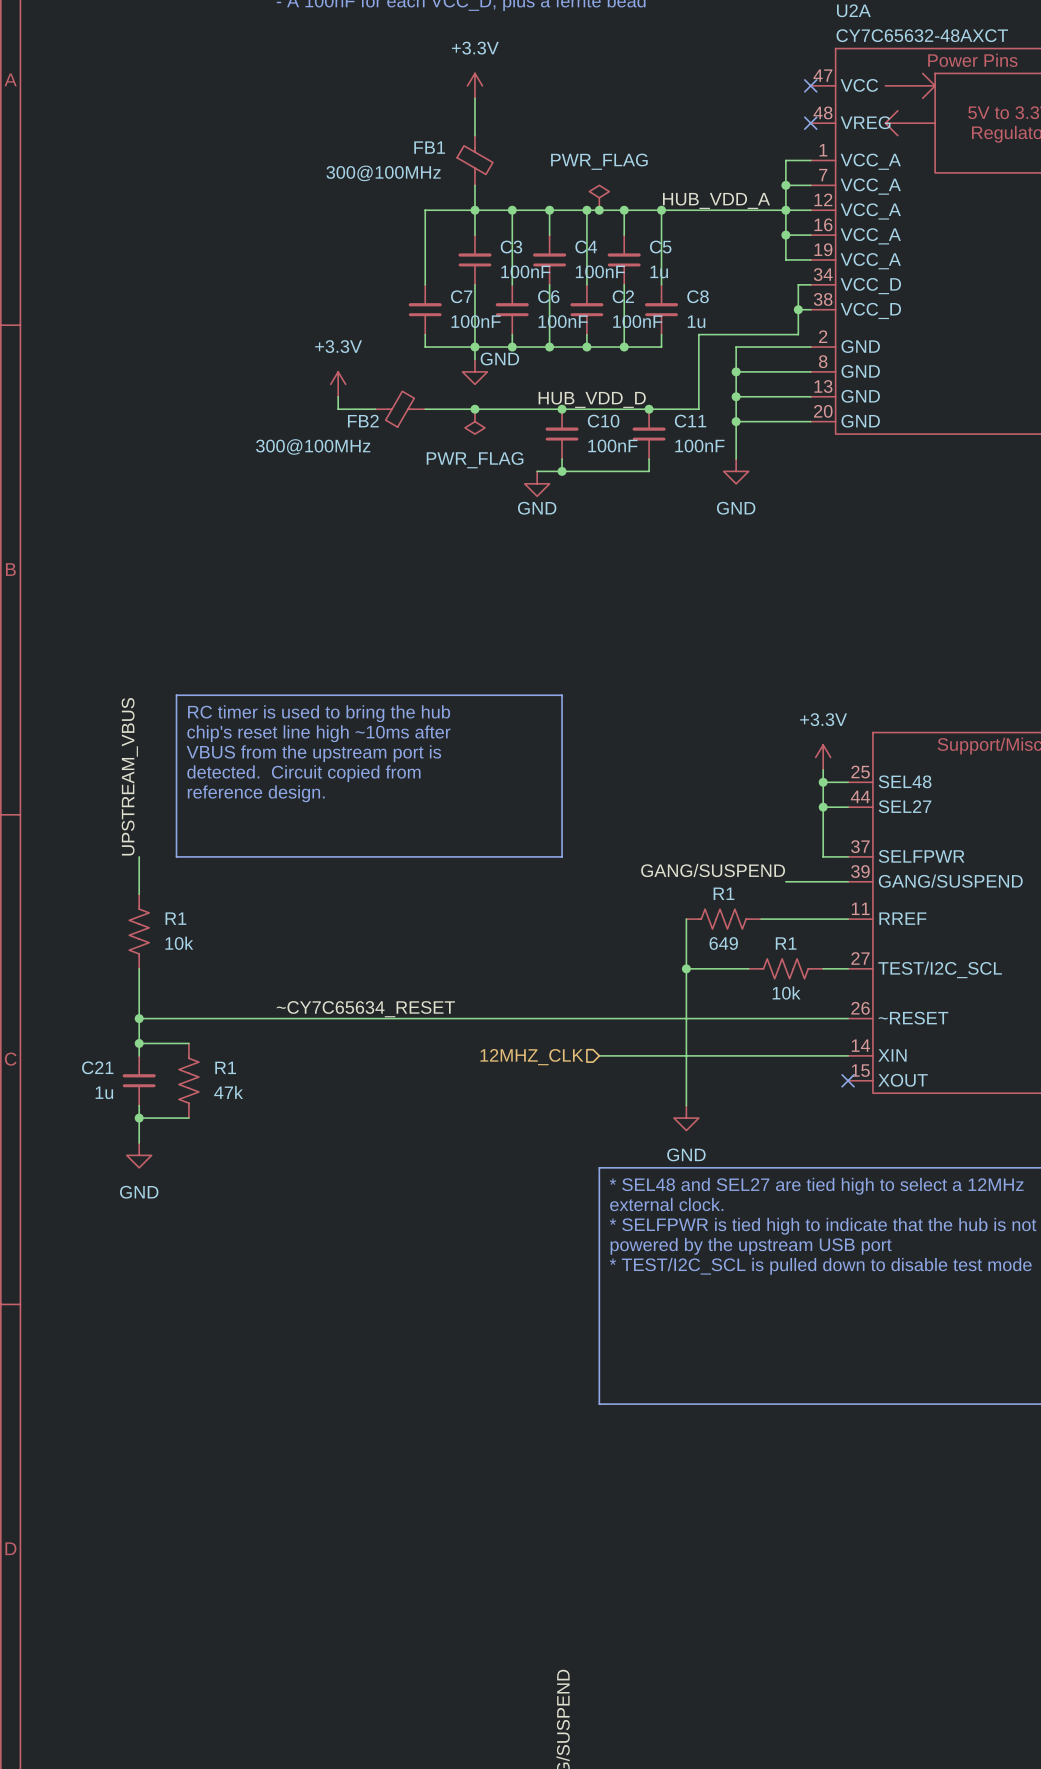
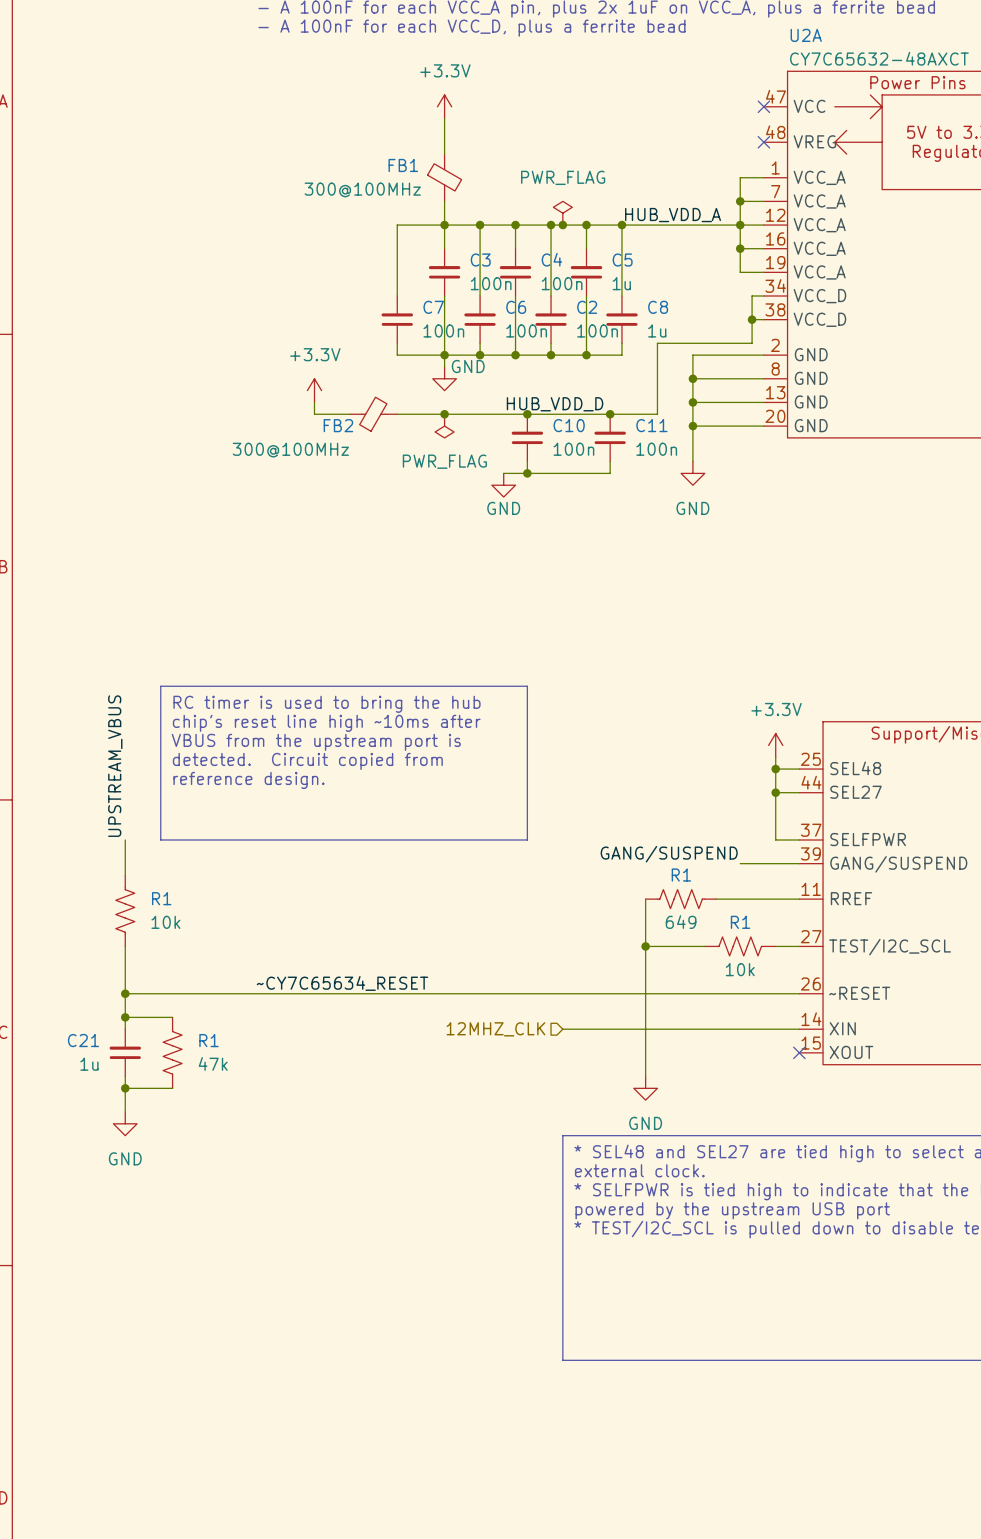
C3 value: 100nF (525, 271) -> 100n (491, 283)
C4 value: 100nF (600, 271) -> 100n (562, 283)
C7 value: 100nF (476, 321) -> 100n (443, 330)
C6 value: 100nF (563, 321) -> 100n (526, 330)
C2 value: 100nF (637, 321) -> 100n (597, 330)
C10 value: 100nF (612, 445) -> 100n (573, 449)
C11 value: 100nF (699, 445) -> 100n (656, 449)

